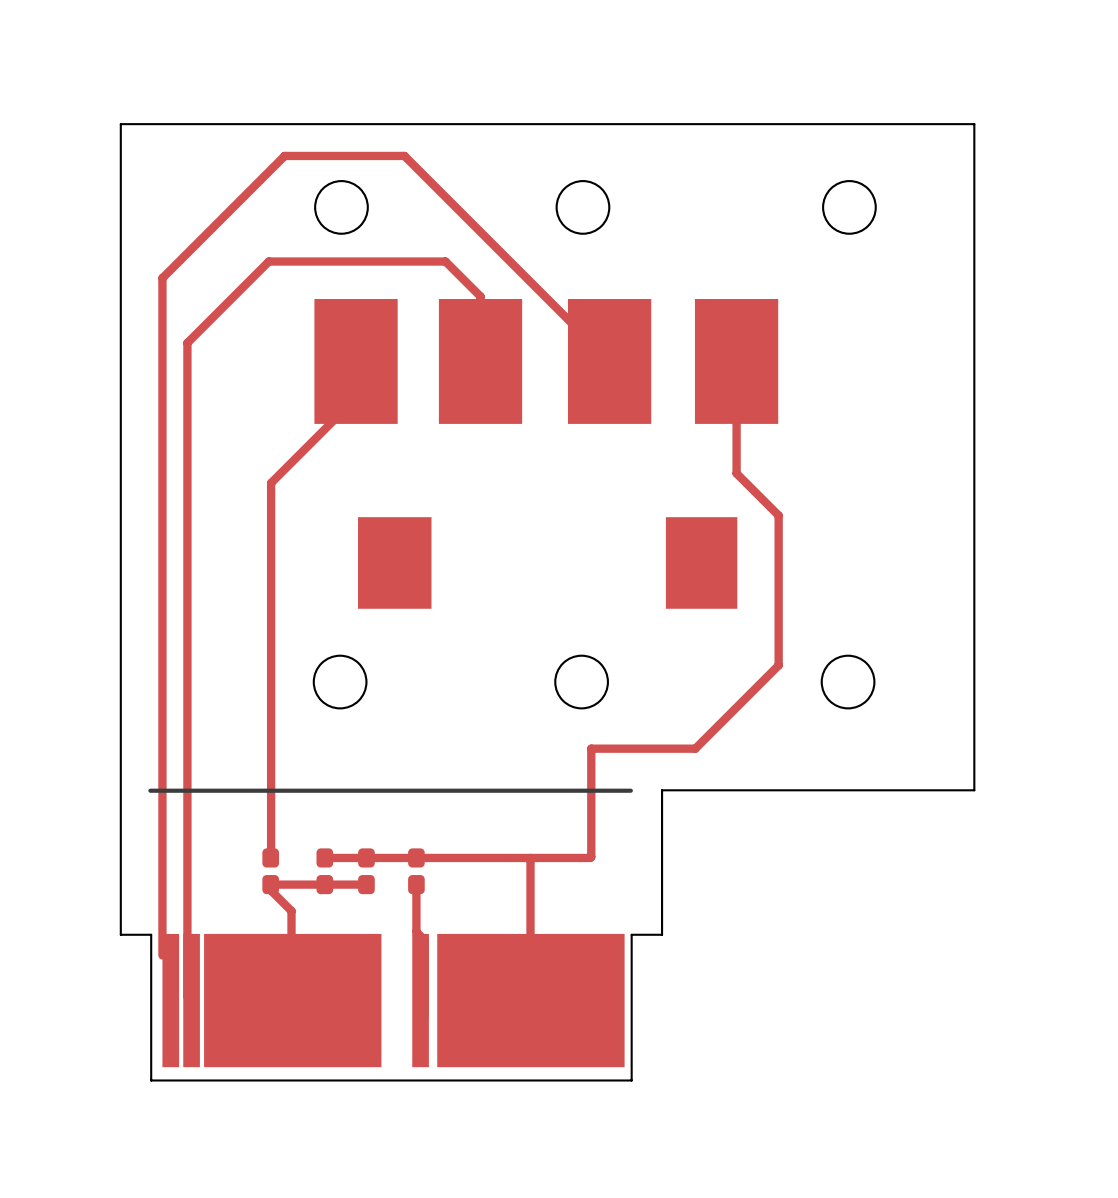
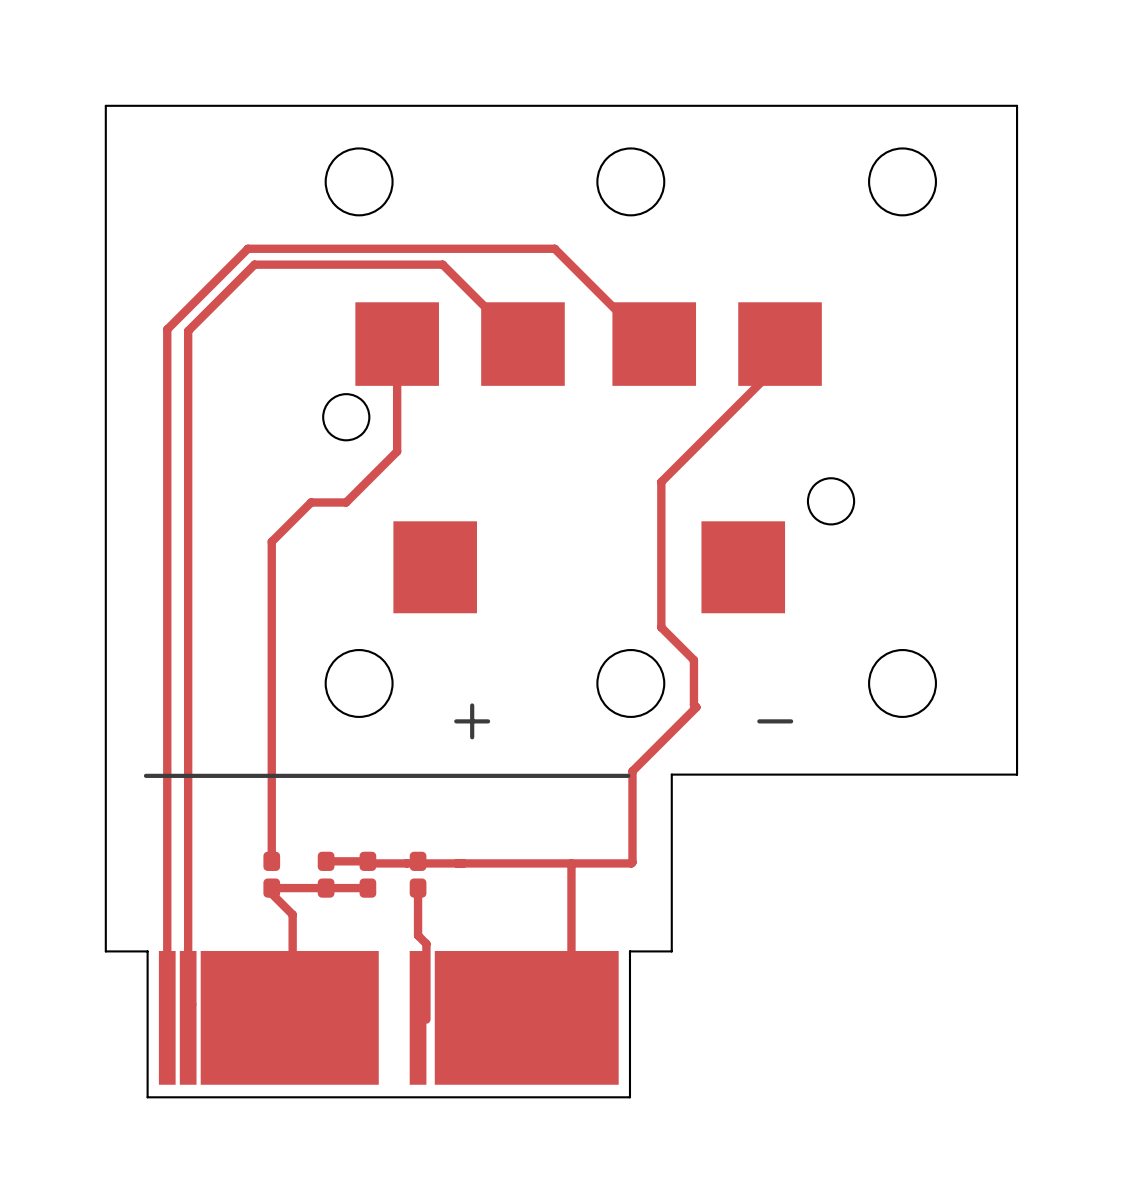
board edge: (120, 124) (974, 124) (974, 790) (662, 790) (662, 934) (631, 934) (631, 1080) (151, 1080) (151, 934) (120, 934) (120, 124) -> (105, 105) (105, 951) (147, 951) (147, 1097) (629, 1097) (629, 951) (671, 951) (671, 774) (1017, 774) (1017, 105) (105, 105)
round board edge: none -> [596, 147, 666, 217]
round board edge: none -> [868, 147, 938, 217]
round board edge: [555, 180, 611, 235] -> none
round board edge: [822, 180, 877, 235] -> none
round board edge position: (341, 207) -> (359, 181)
part footprint: [314, 299, 779, 609] -> [322, 302, 856, 614]
top track: (187, 342) (268, 261) (445, 261) (480, 296) (480, 361) -> (188, 344) (188, 331) (254, 264) (442, 264) (521, 343)
top track: none -> (397, 344) (397, 451) (346, 502) (311, 502) (271, 541) (271, 861)
top track: none -> (654, 344) (650, 344) (554, 248) (247, 248) (167, 329) (167, 1017)
top track: (610, 361) (404, 155) (284, 155) (162, 278) (162, 955) -> none
top track: (736, 361) (736, 473) (778, 515) (778, 665) (695, 748) (591, 748) (590, 857) (366, 857) -> none
top track: none -> (778, 364) (661, 482) (661, 627) (693, 660) (693, 704) (696, 707) (632, 771) (632, 862) (364, 862)
top track: (368, 385) (271, 483) (271, 858) (274, 862) -> none
round board edge: none -> [596, 649, 666, 718]
round board edge: none -> [868, 649, 938, 718]
round board edge size: [312, 654, 368, 710] -> [324, 649, 394, 718]
round board edge: [554, 654, 609, 710] -> none
round board edge: [820, 654, 876, 710] -> none
text: none -> + (472, 721)
text: none -> - (775, 721)
line: (150, 790) (630, 790) -> (145, 775) (628, 775)
top track: (530, 857) (530, 1015) -> (571, 863) (571, 1021)
part footprint: [162, 933, 625, 1068] -> [158, 951, 619, 1085]

